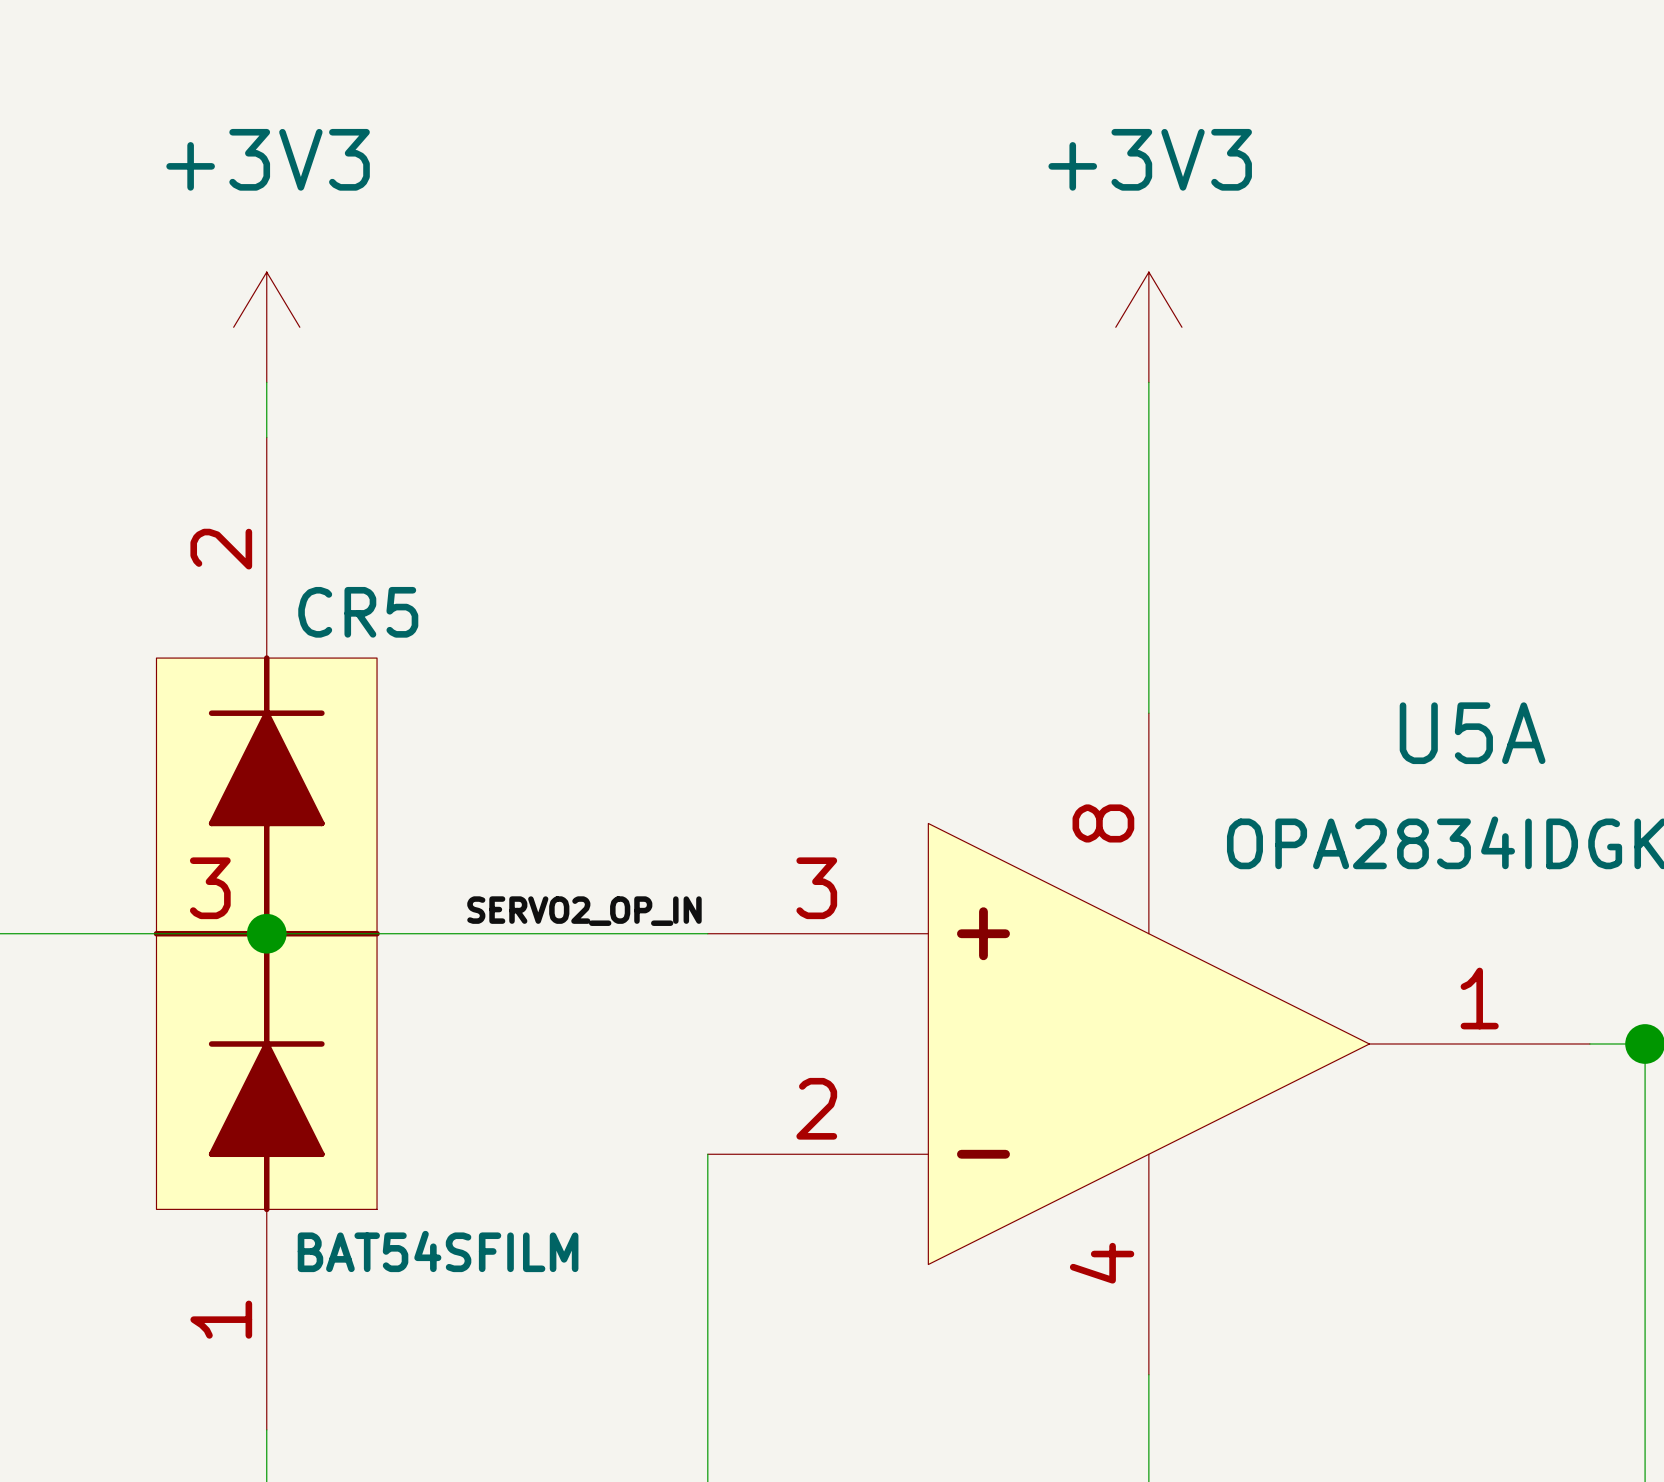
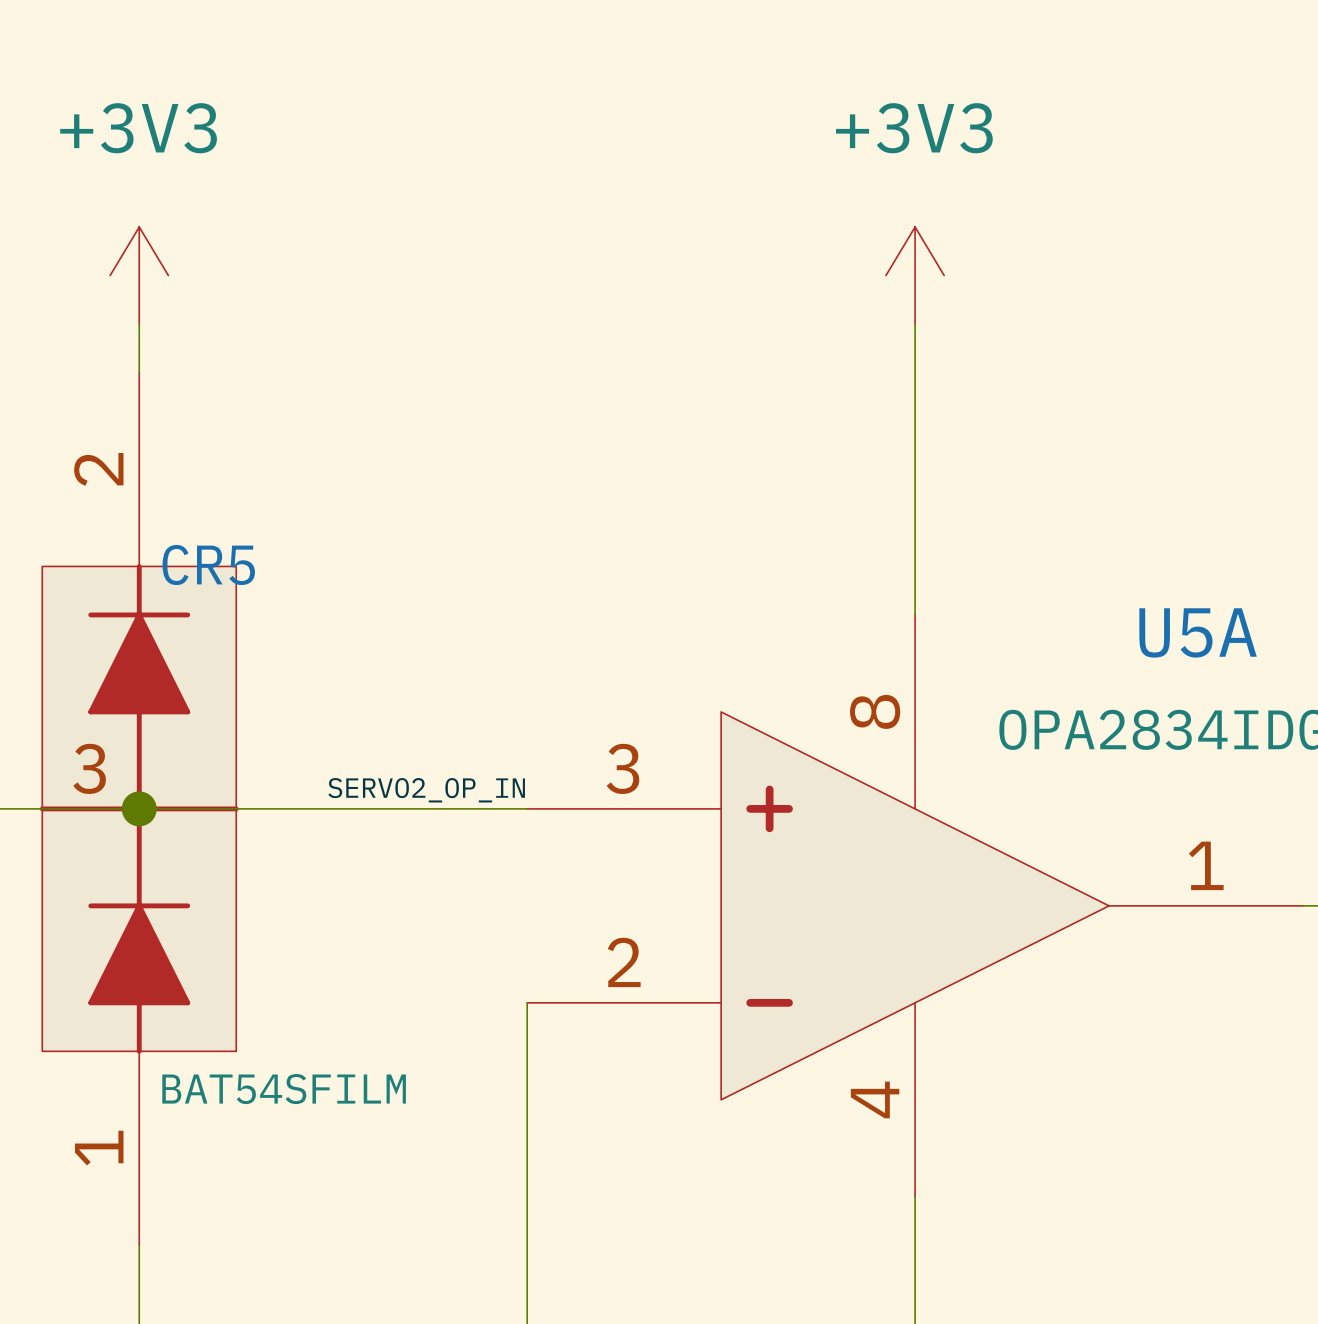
CR5 name position: CR5 (358, 612) -> CR5 (208, 564)

